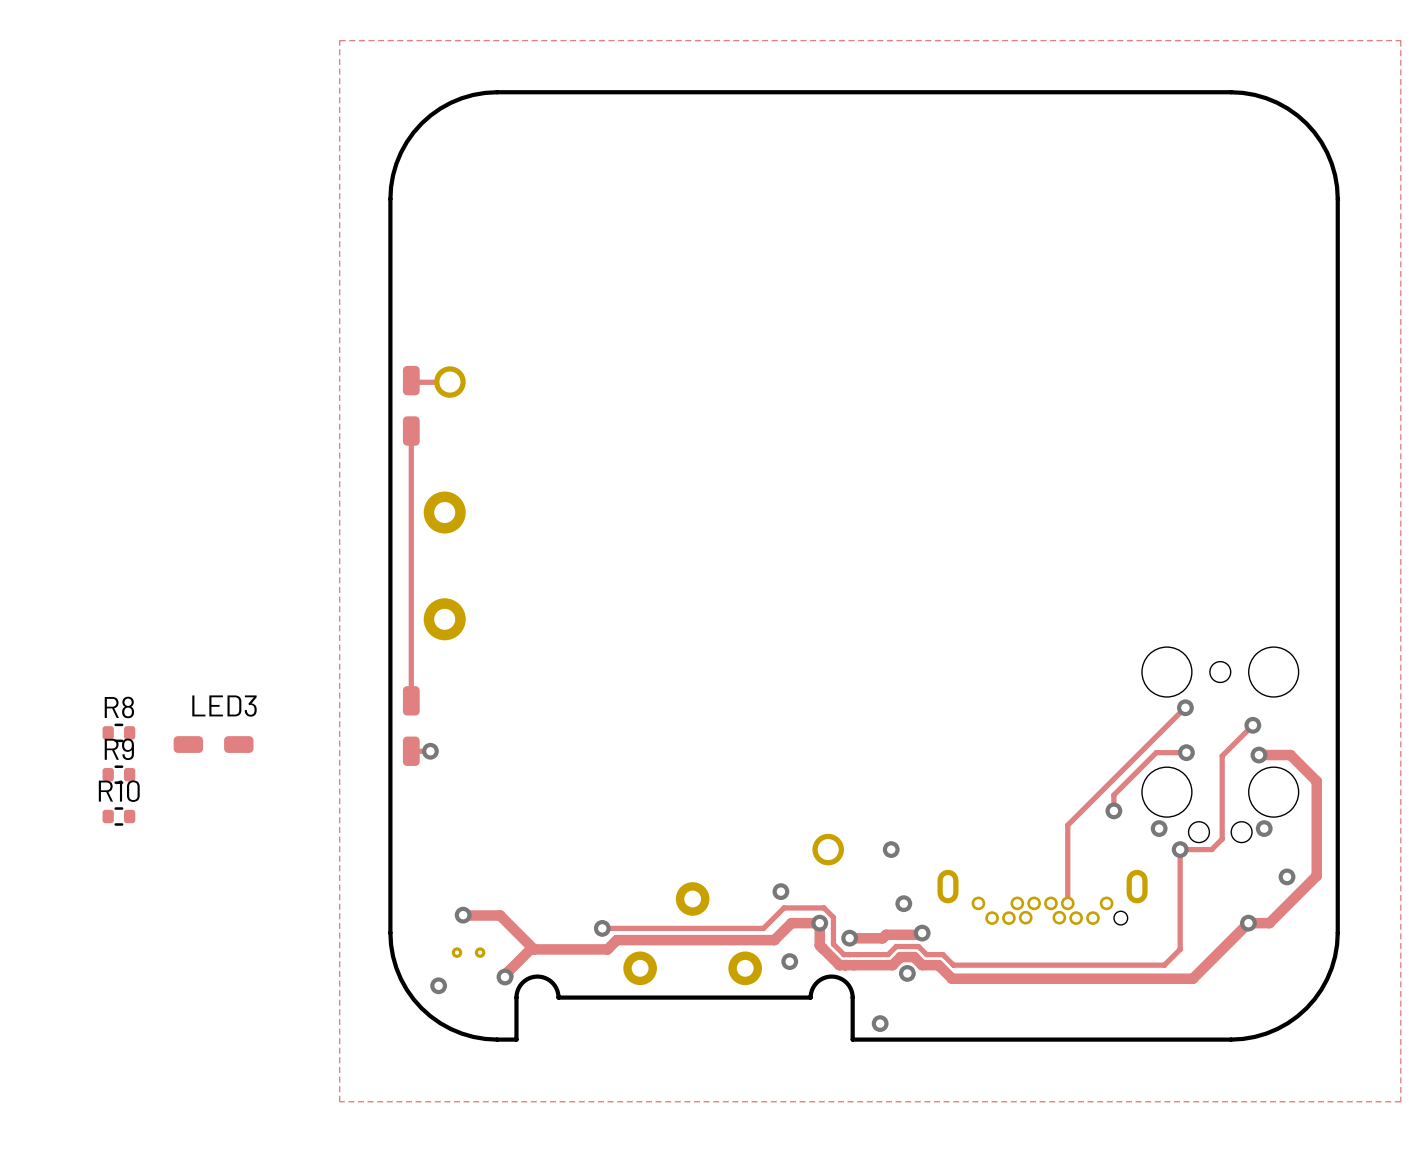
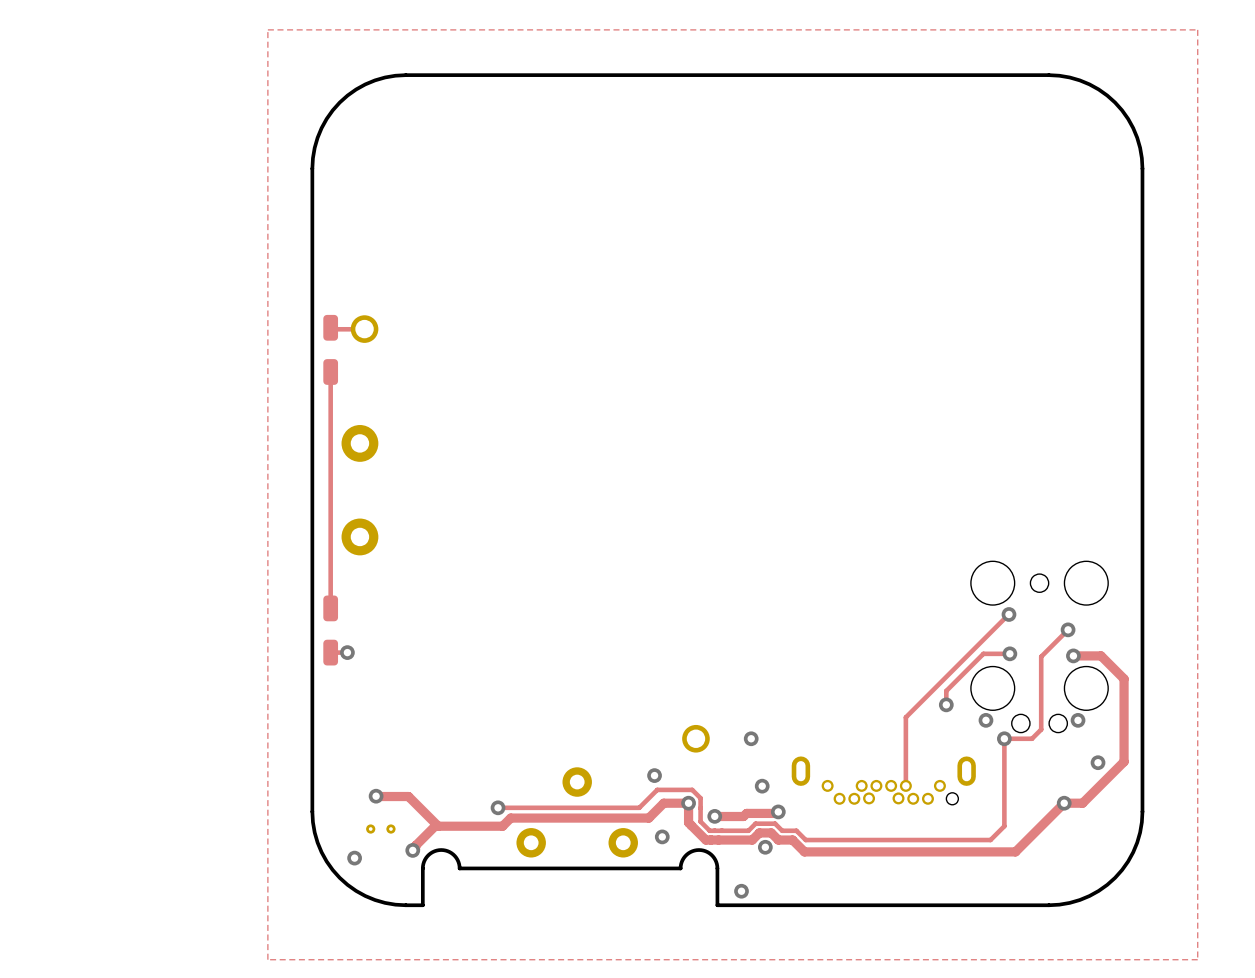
R8: (118, 732) -> none
LED3: (213, 744) -> none
R9: (118, 774) -> none
R10: (118, 816) -> none

